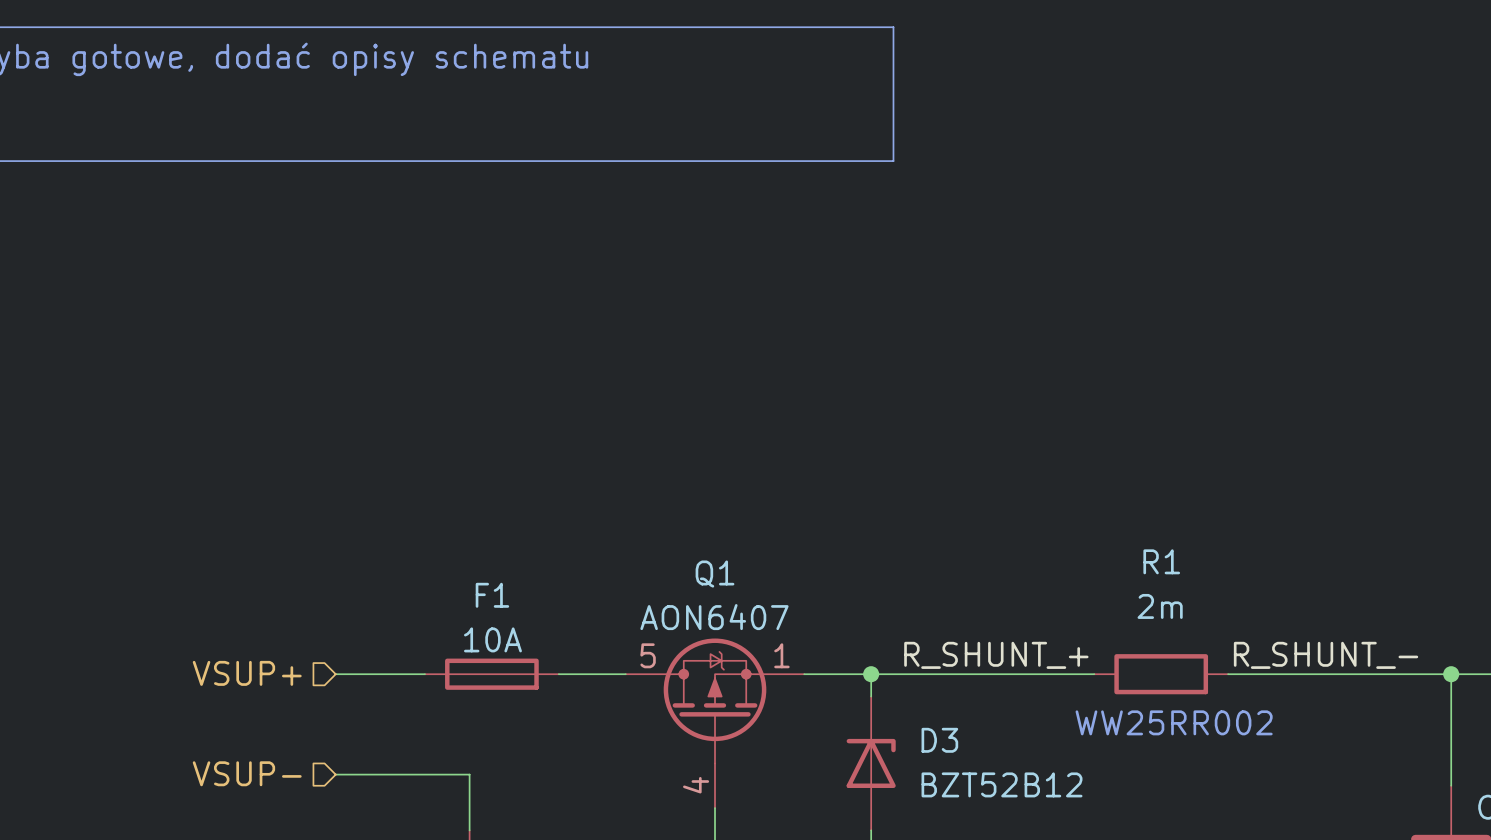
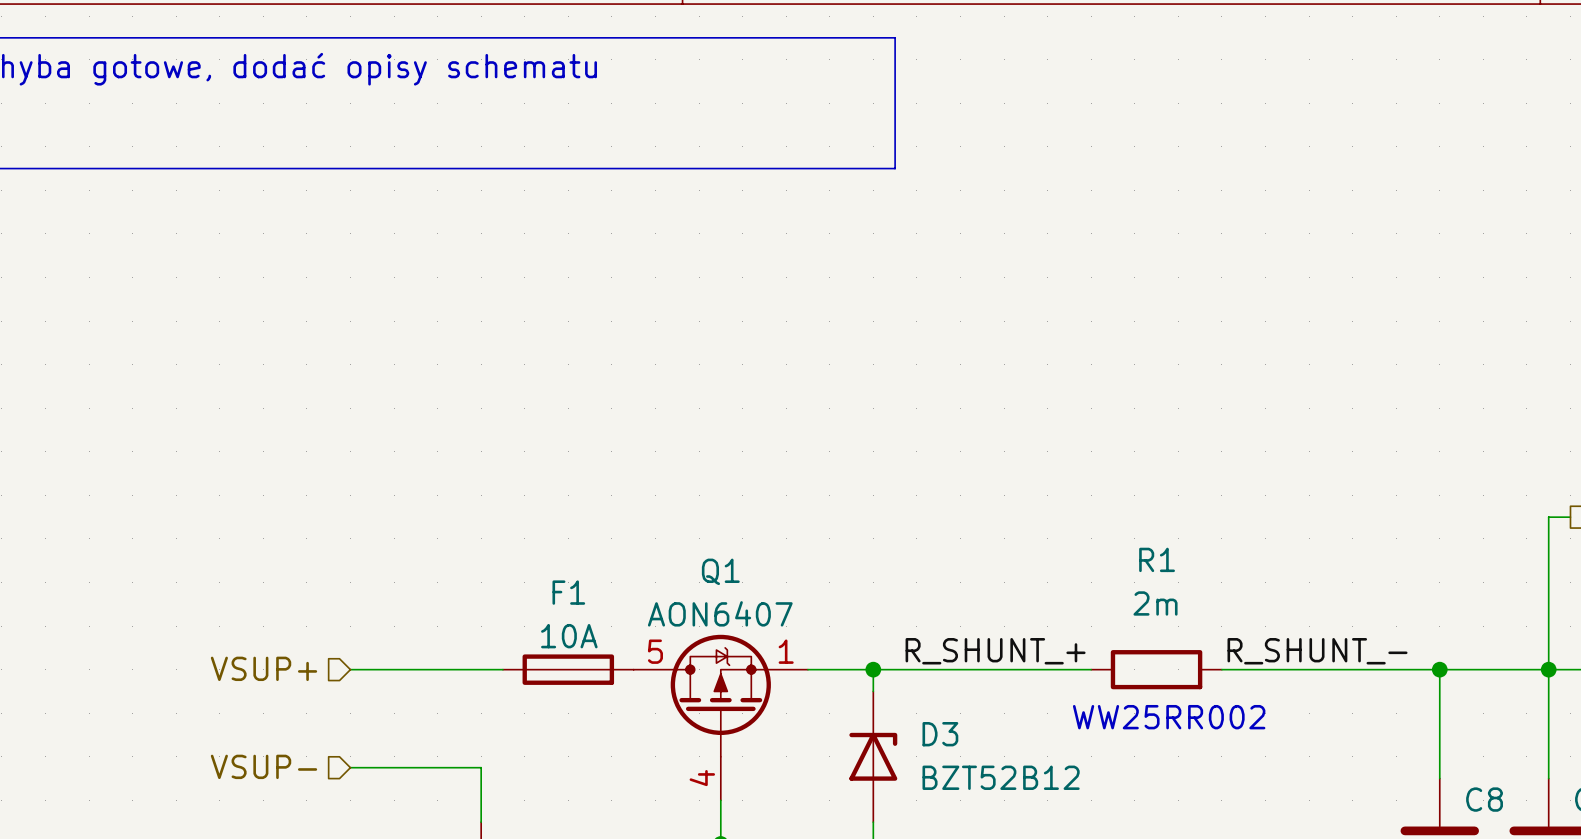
F1 position: (491, 674) -> (568, 669)

